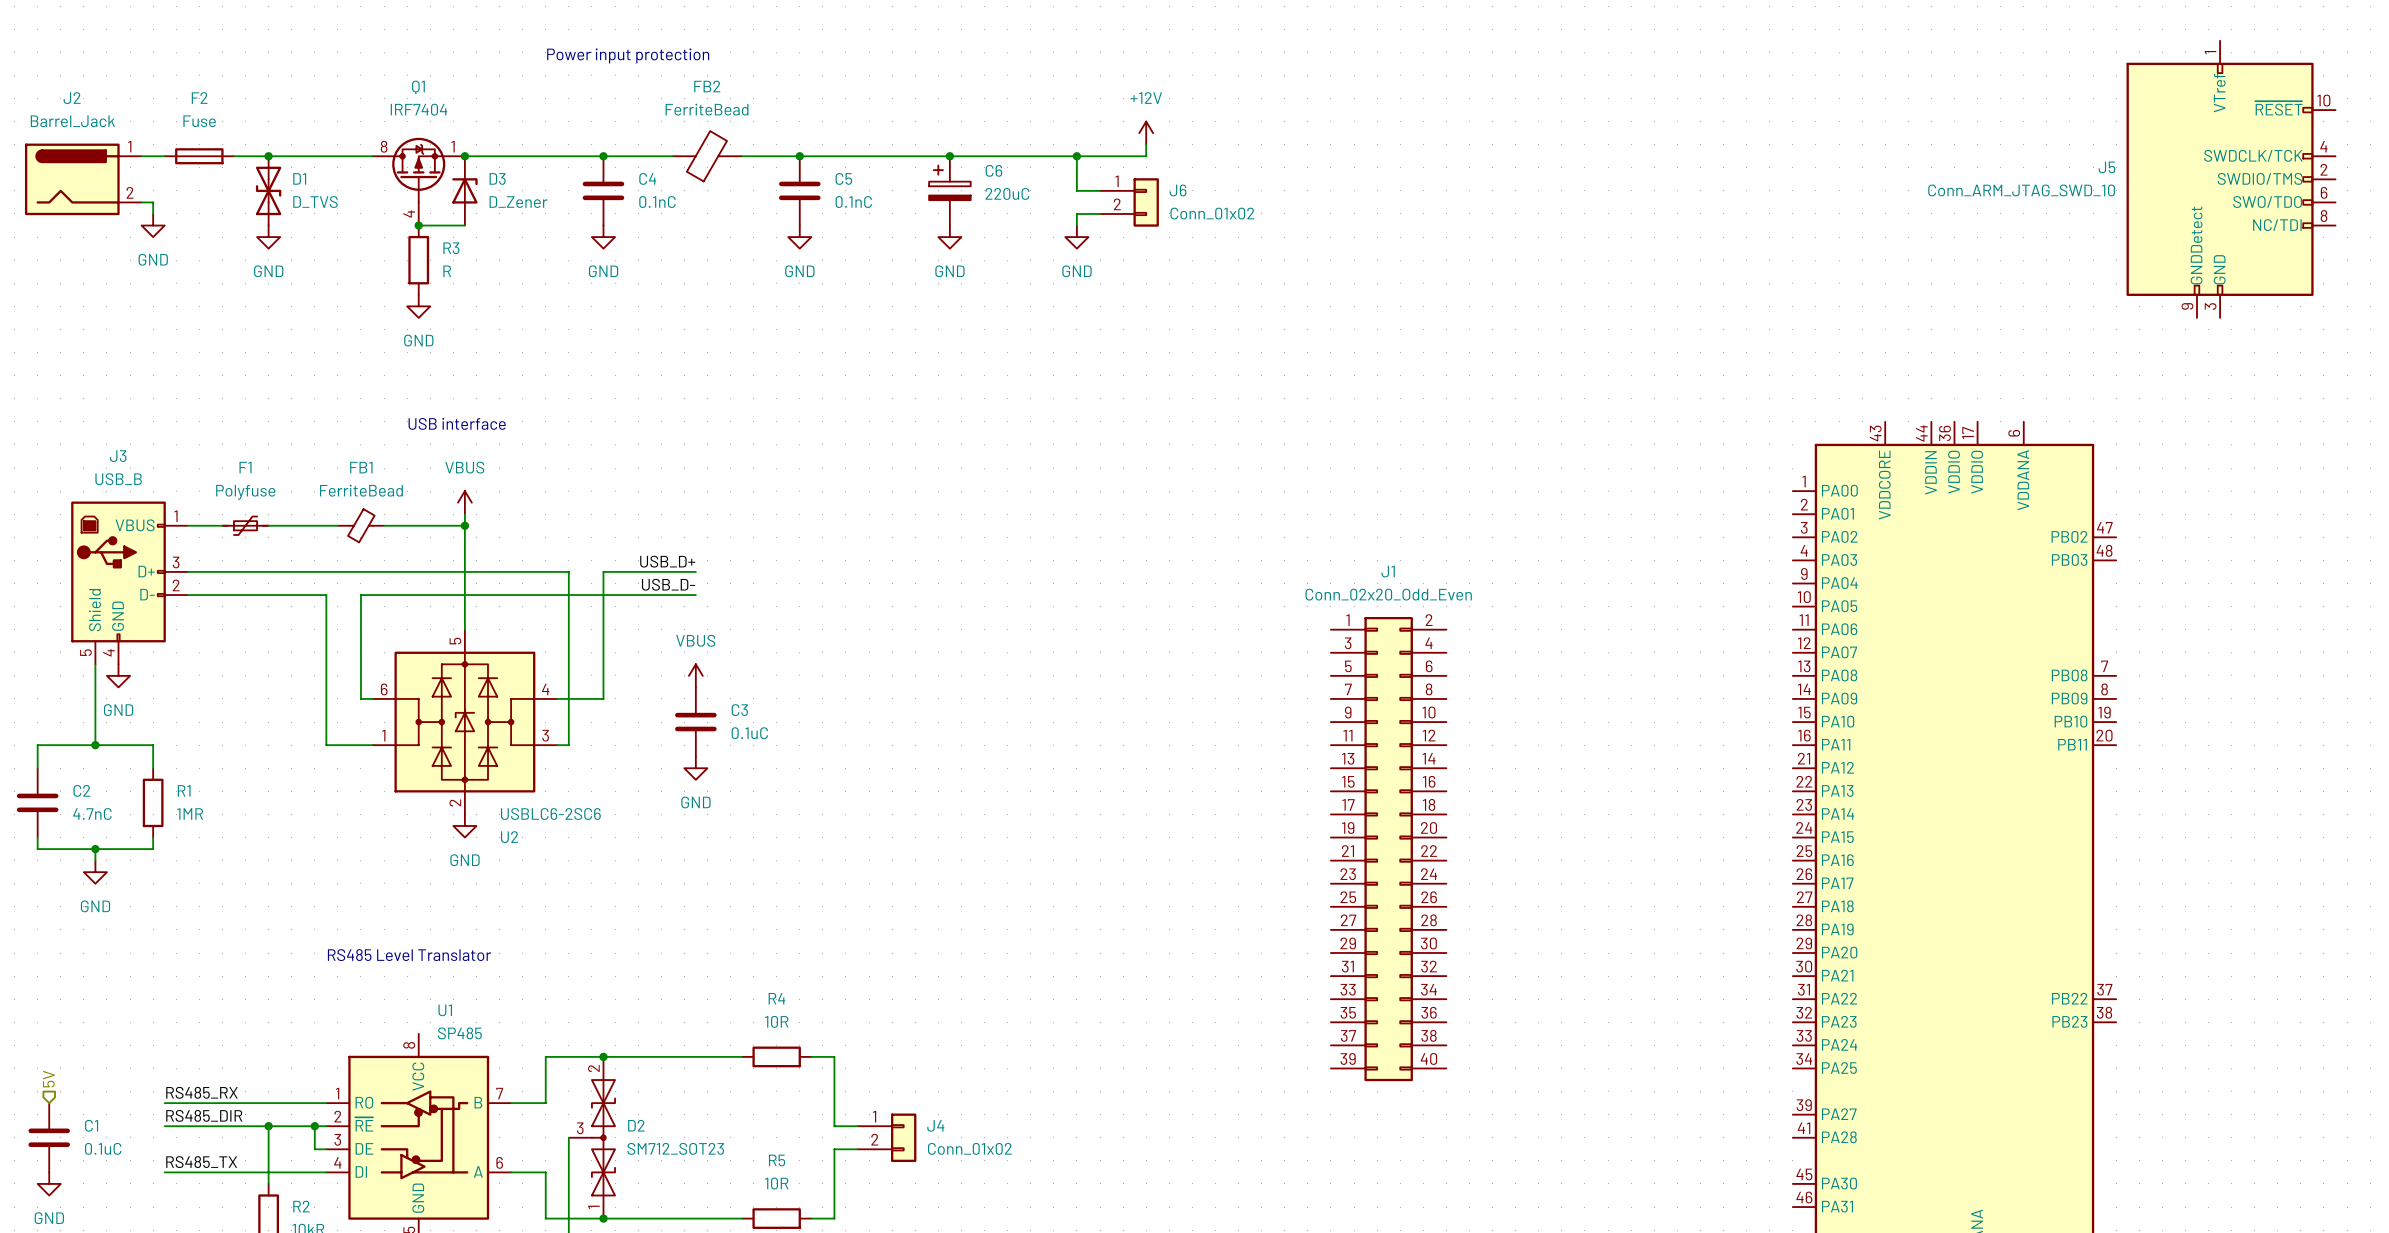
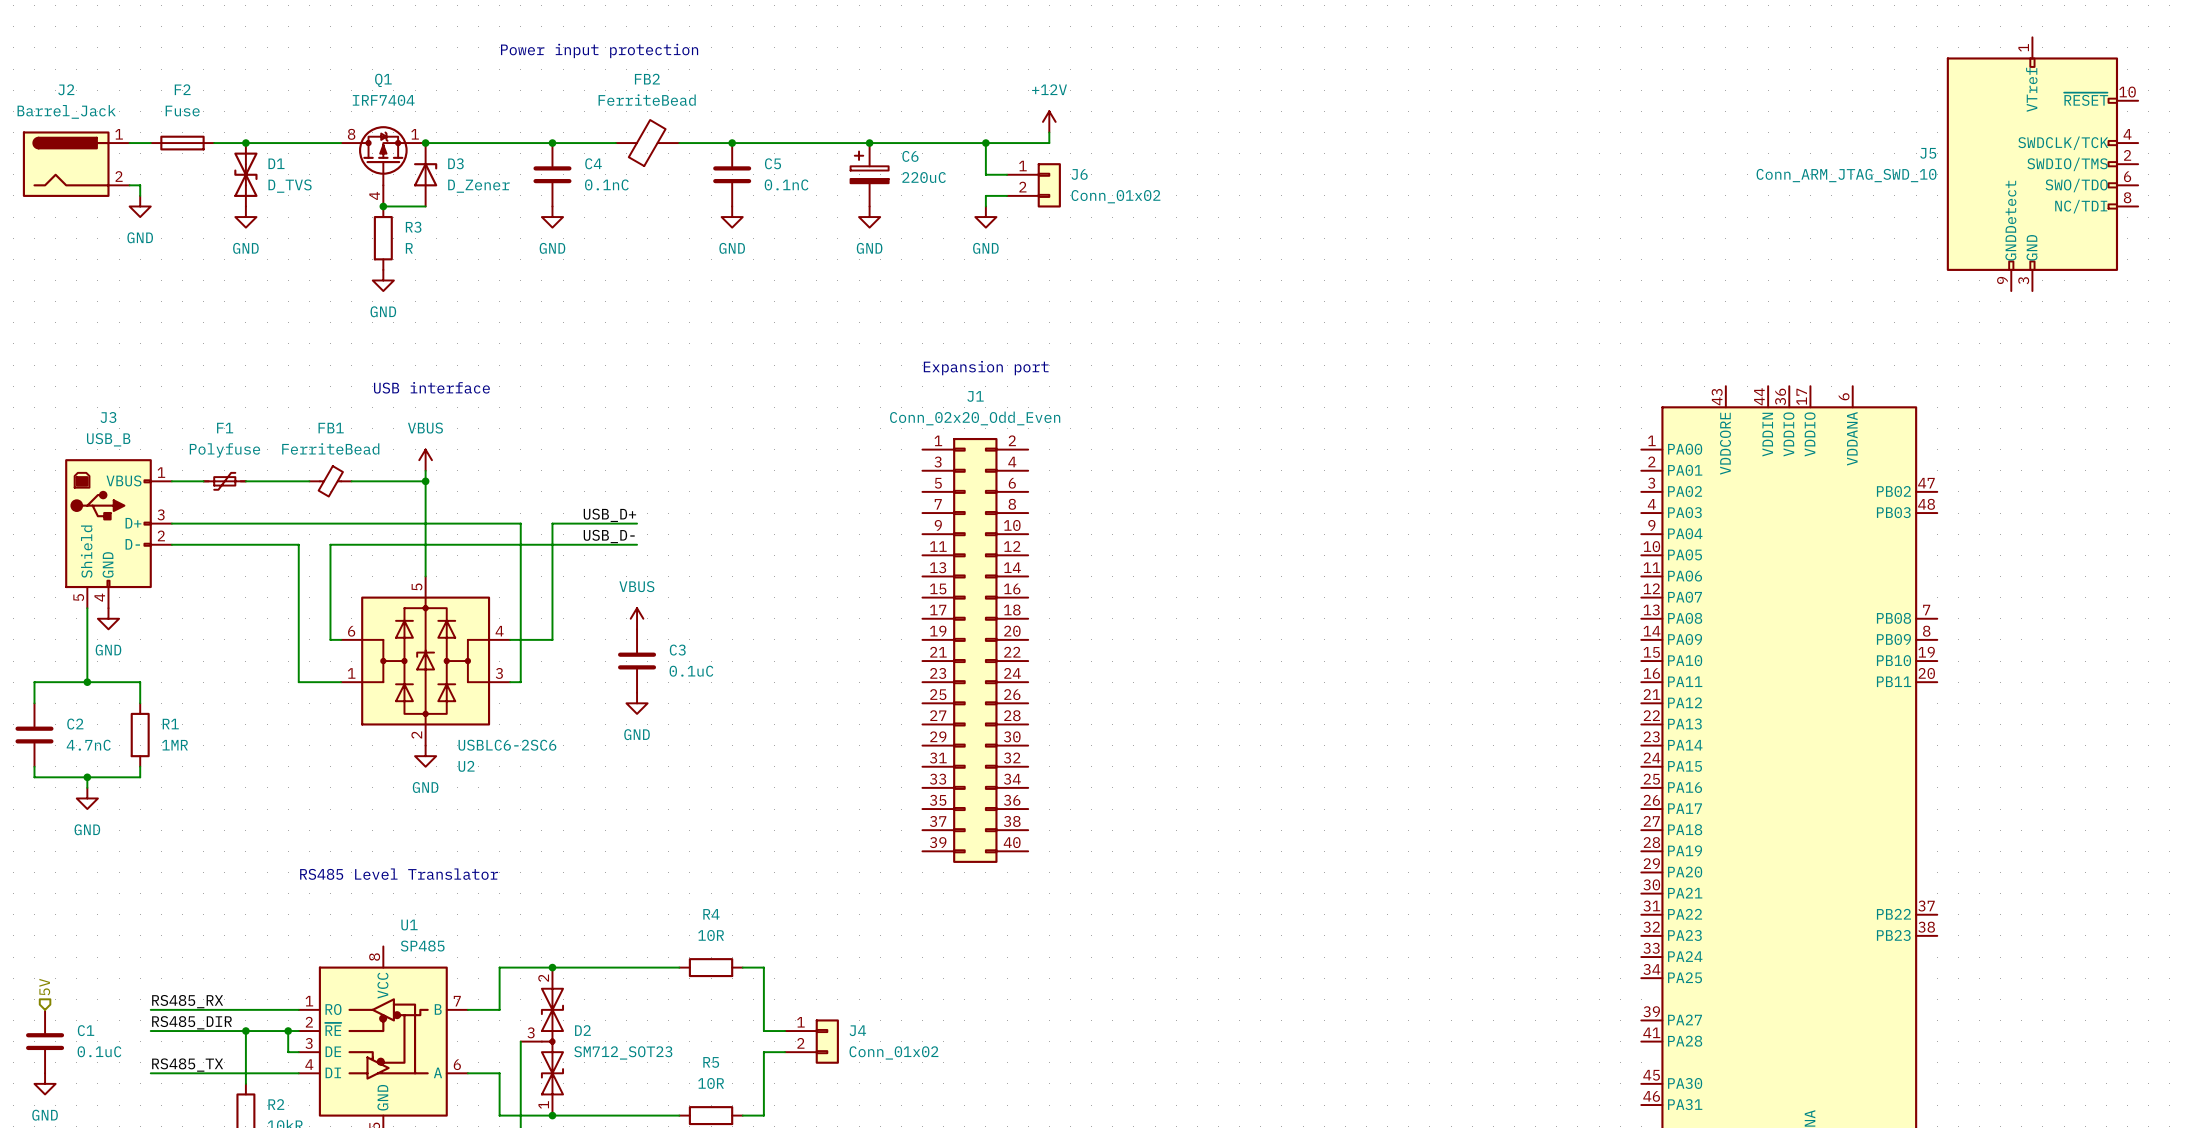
text: none -> Expansion port (986, 368)
J1 position: (1388, 849) -> (975, 650)

